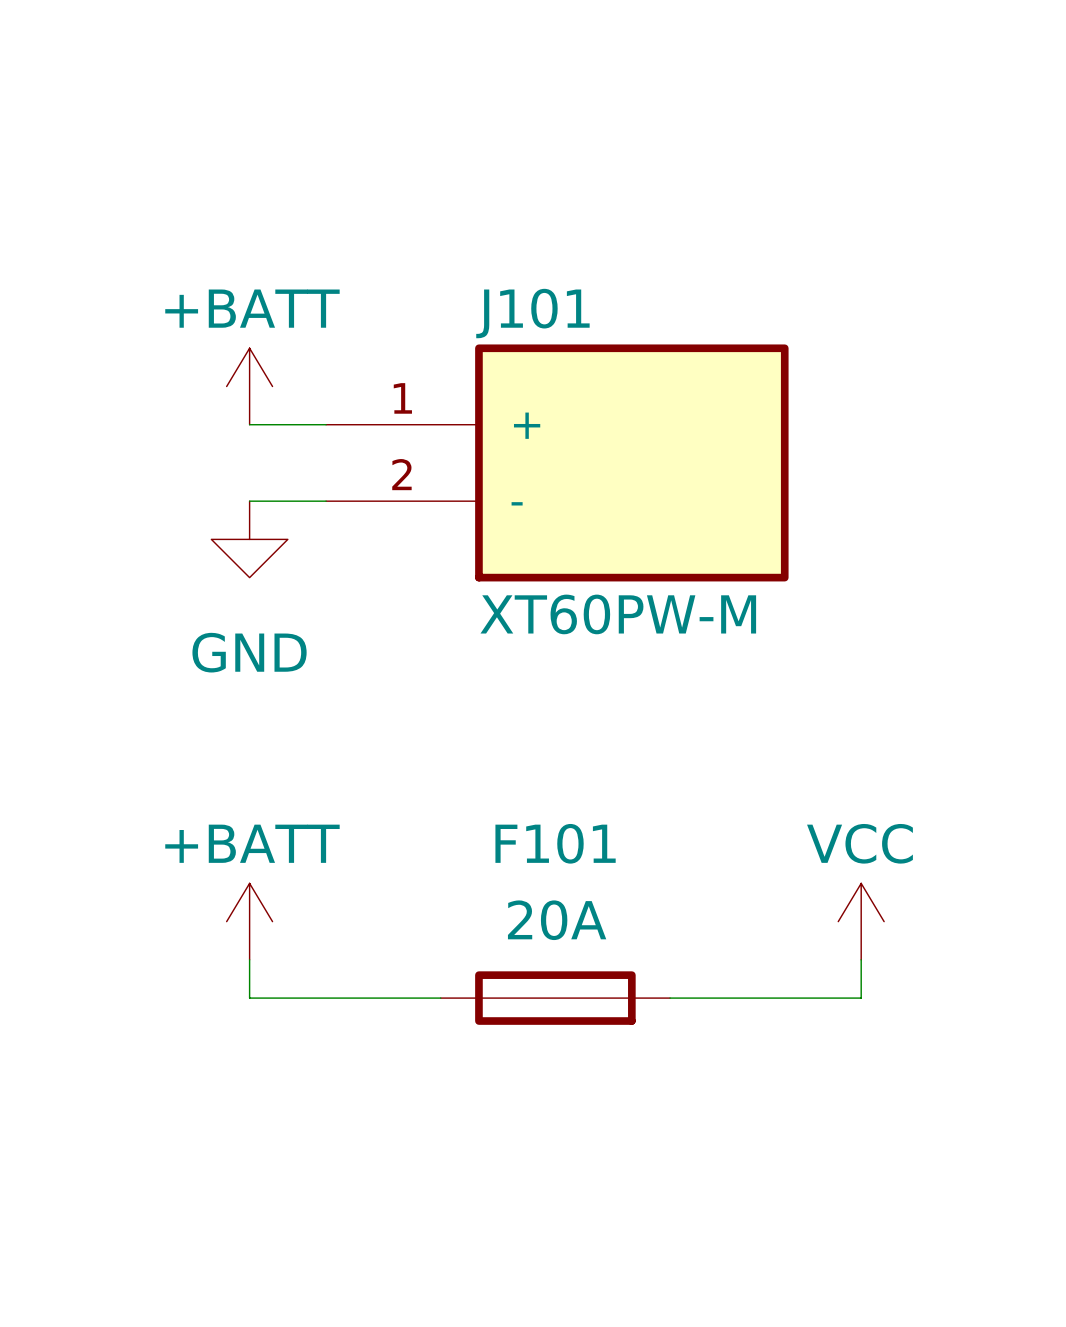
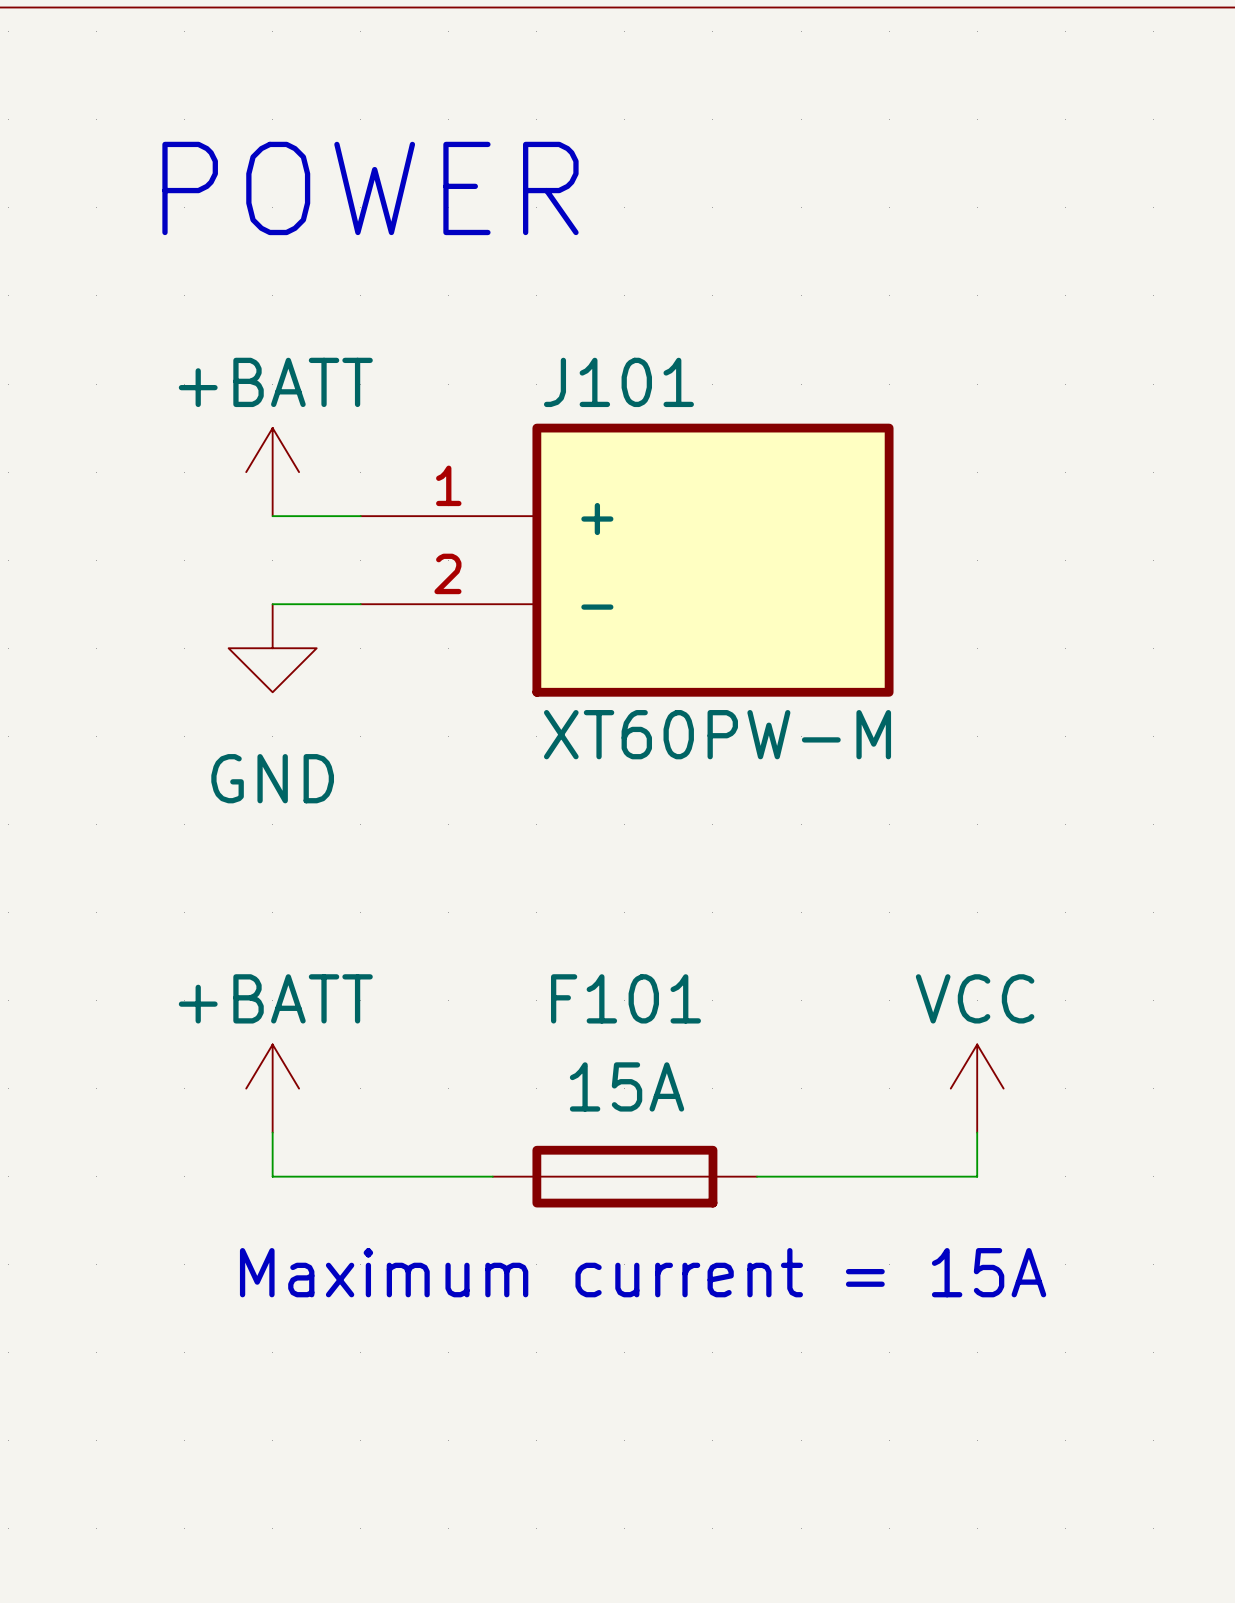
text: none -> POWER (370, 188)
F101 value: 20A (557, 920) -> 15A (627, 1086)
text: none -> Maximum current = 15A (643, 1272)

